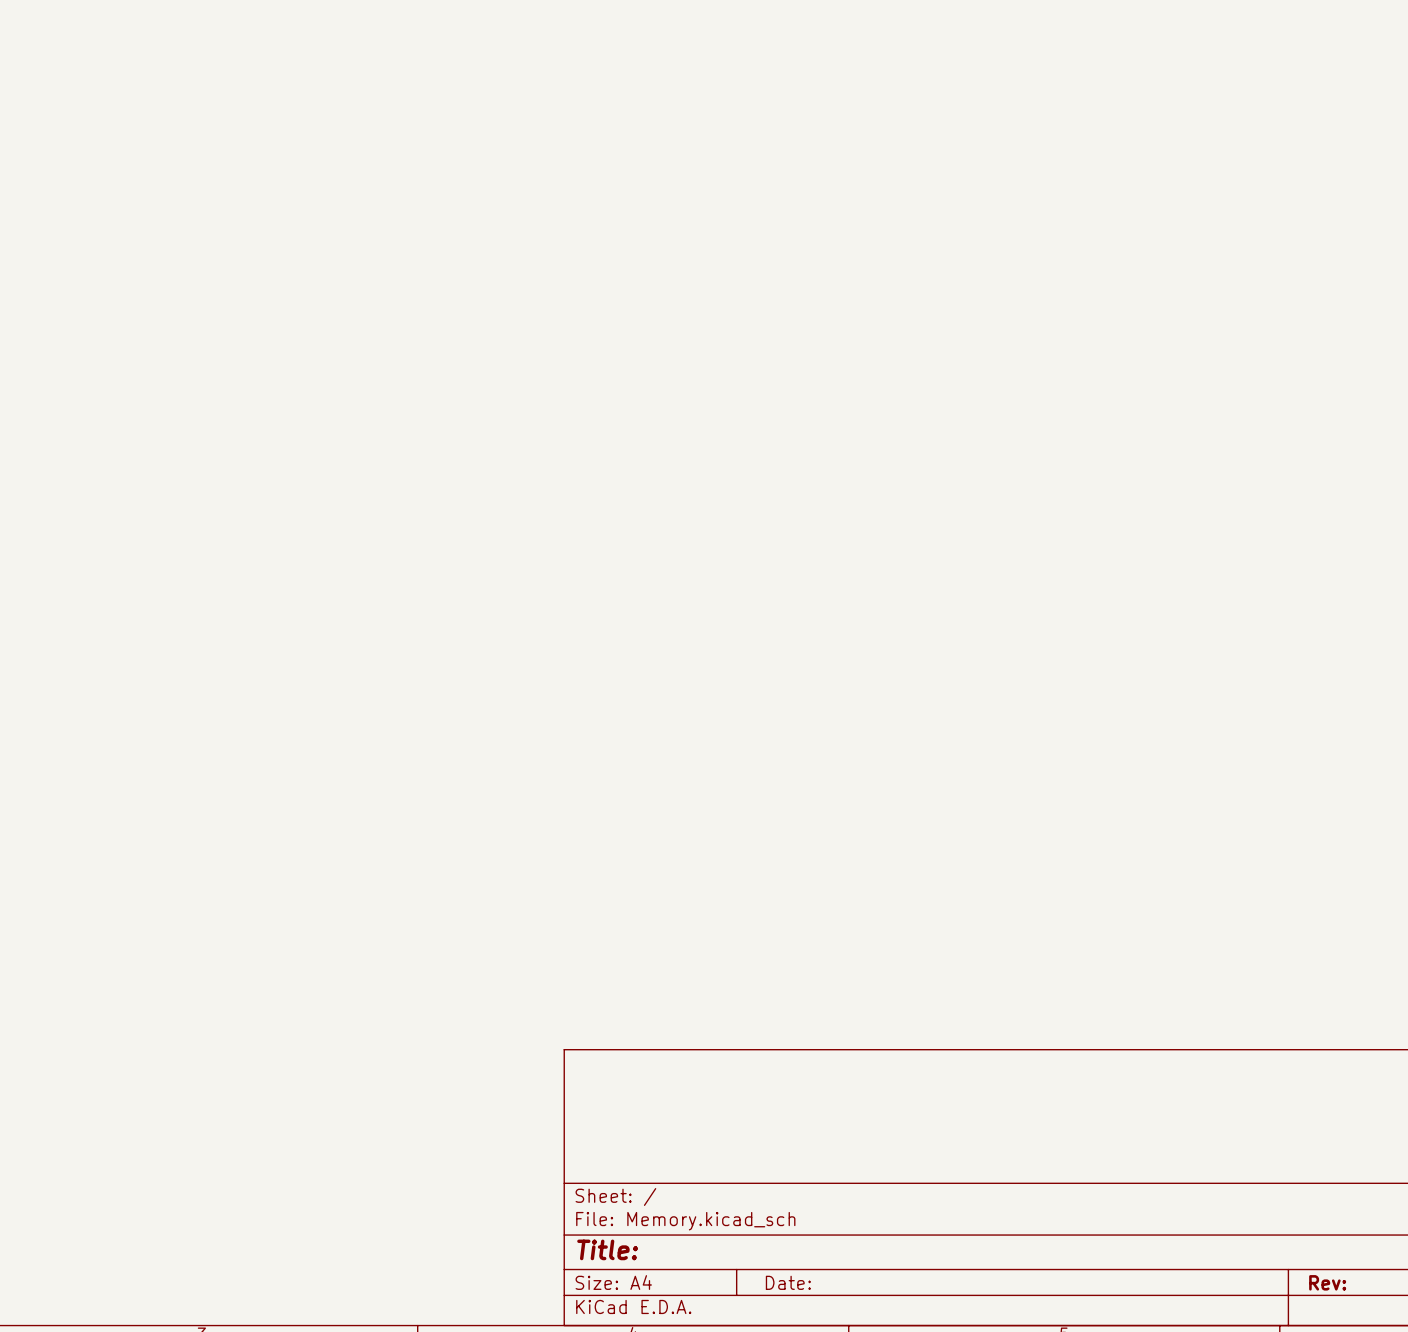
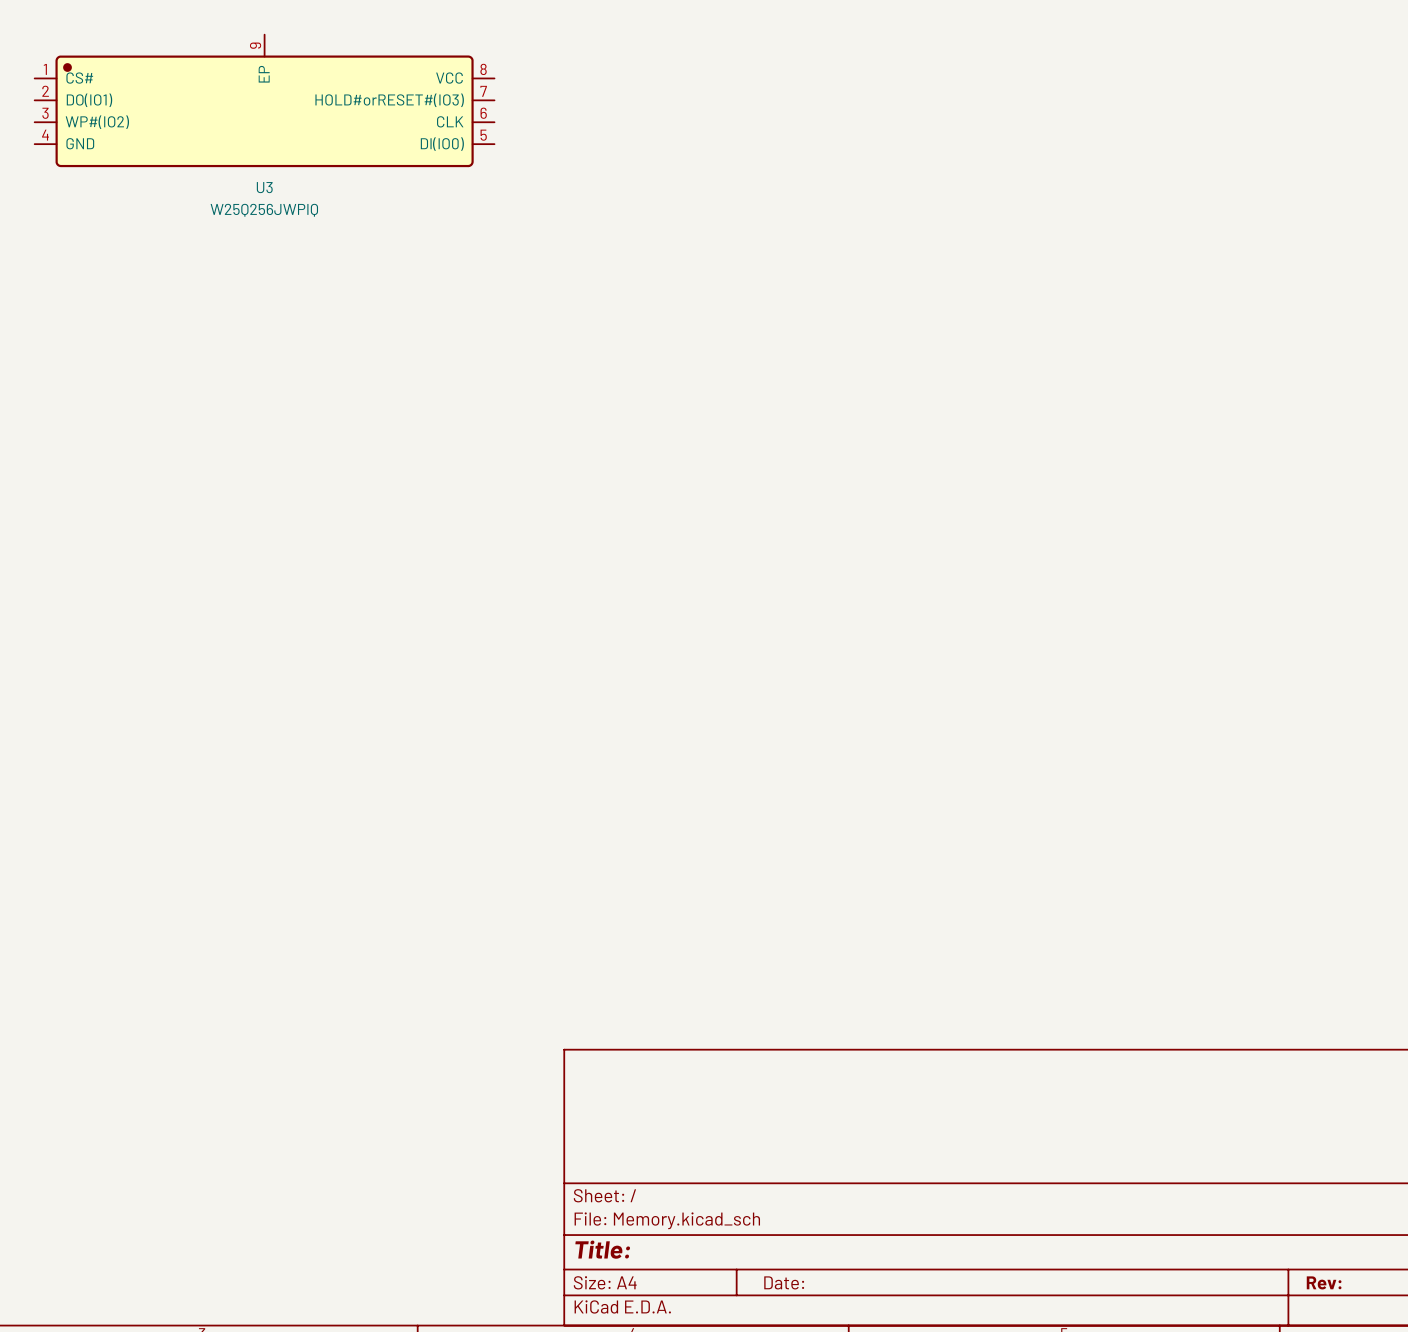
U3: none -> W25Q256JWPIQ (264, 100)

